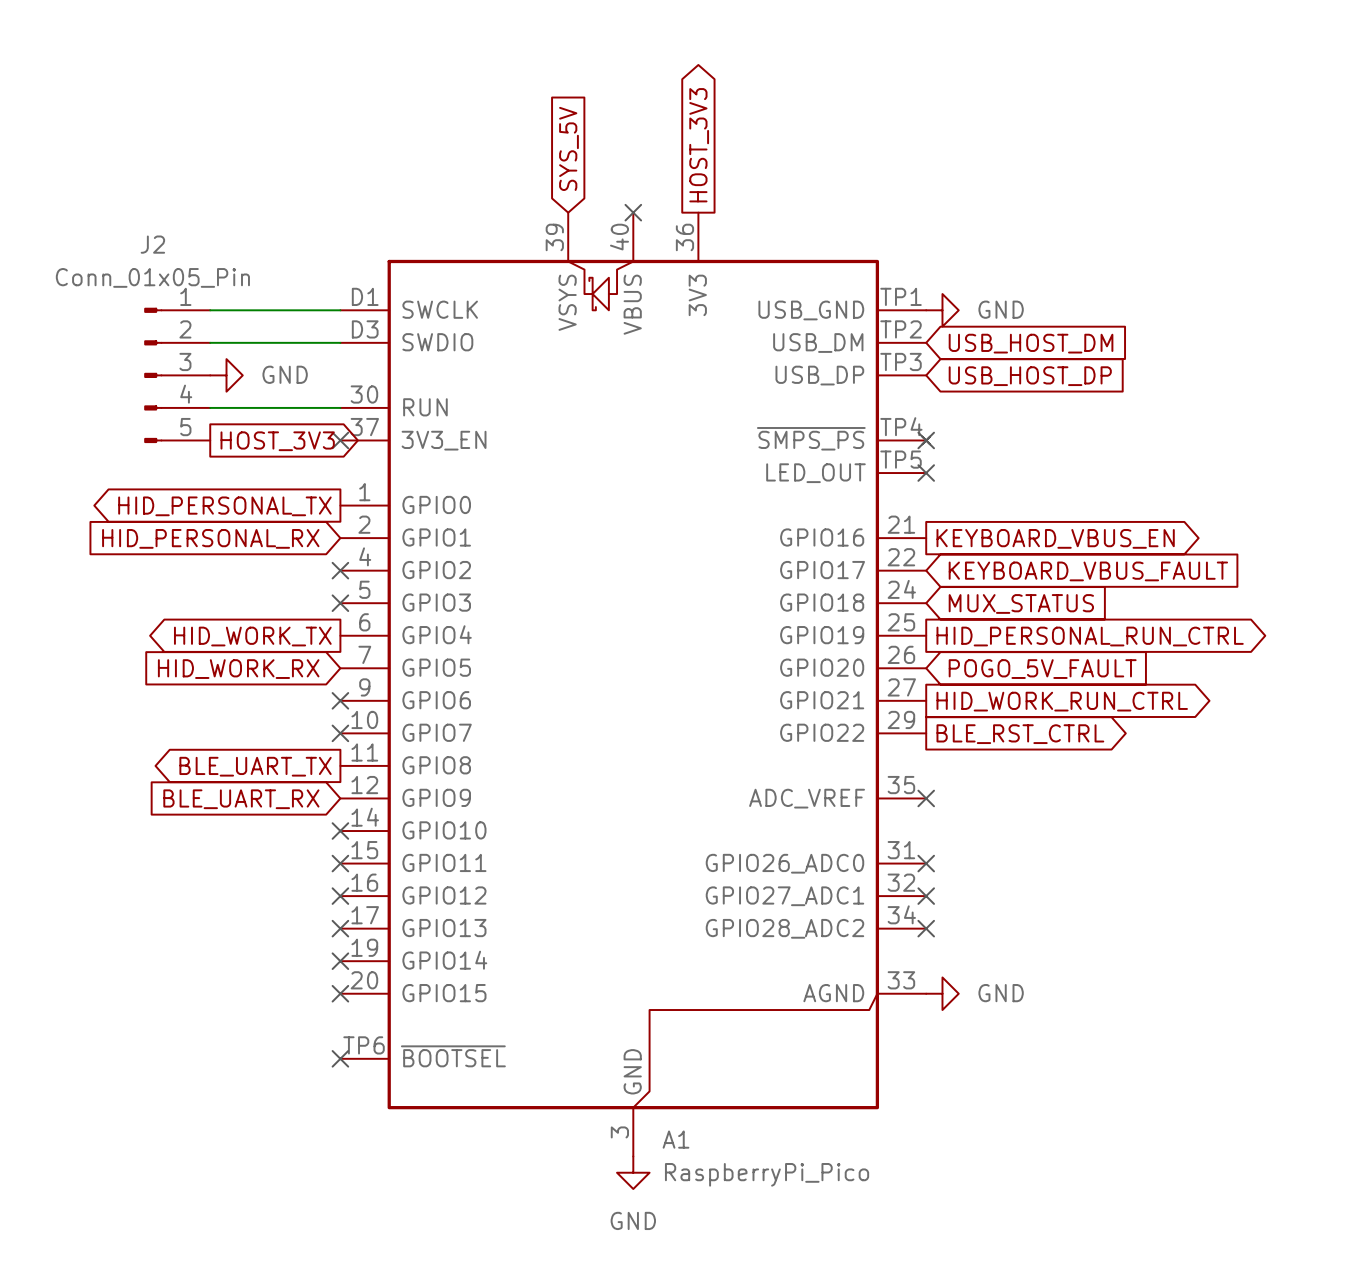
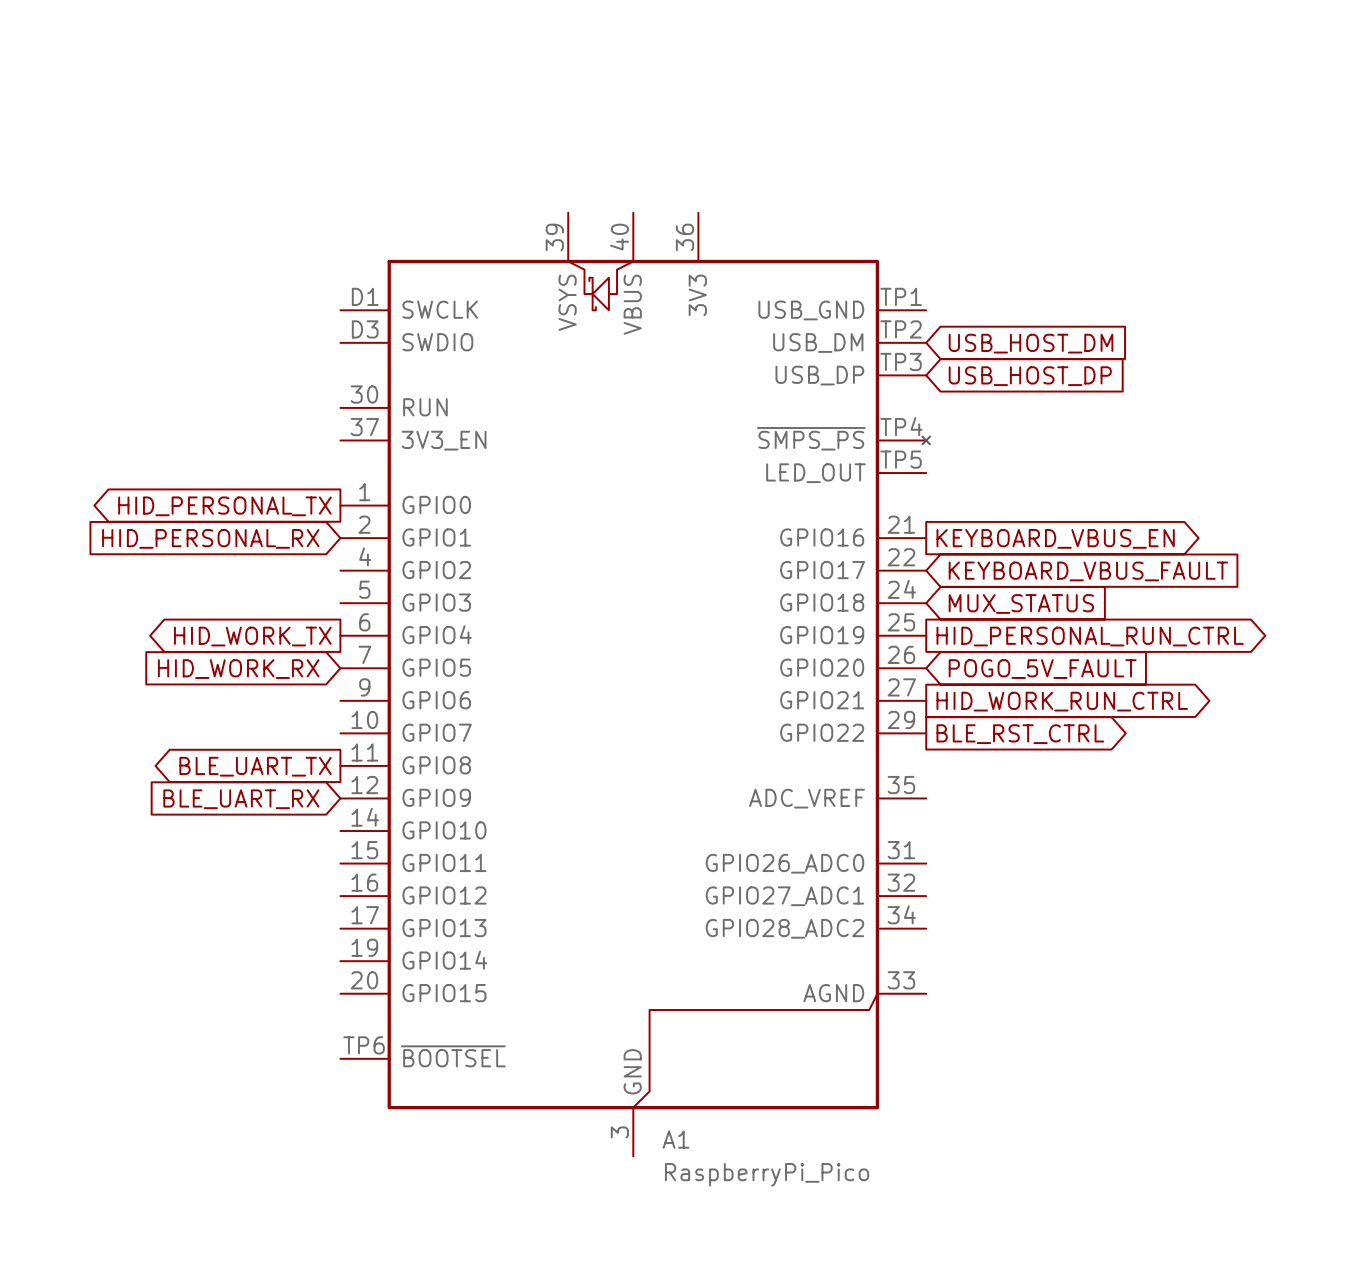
global label: HOST_3V3 (699, 145) -> none
global label: SYS_5V (568, 148) -> none
no-connect mark: (633, 212) -> none
wire: (210, 310) (340, 310) -> none
power symbol: GND (942, 310) -> none
wire: (210, 342) (340, 342) -> none
J2: Conn_01x05_Pin (177, 375) -> none
power symbol: GND (226, 375) -> none
wire: (210, 407) (340, 407) -> none
no-connect mark: (340, 440) -> none
no-connect mark: (926, 440) -> none
global label: HOST_3V3 (277, 441) -> none
no-connect mark: (926, 473) -> none
no-connect mark: (340, 570) -> none
no-connect mark: (340, 603) -> none
no-connect mark: (340, 700) -> none
no-connect mark: (340, 733) -> none
no-connect mark: (926, 798) -> none
no-connect mark: (340, 831) -> none
no-connect mark: (340, 863) -> none
no-connect mark: (926, 863) -> none
no-connect mark: (340, 896) -> none
no-connect mark: (926, 896) -> none
no-connect mark: (340, 928) -> none
no-connect mark: (926, 928) -> none
no-connect mark: (340, 961) -> none
no-connect mark: (340, 993) -> none
power symbol: GND (942, 993) -> none
no-connect mark: (340, 1058) -> none
power symbol: GND (633, 1172) -> none

